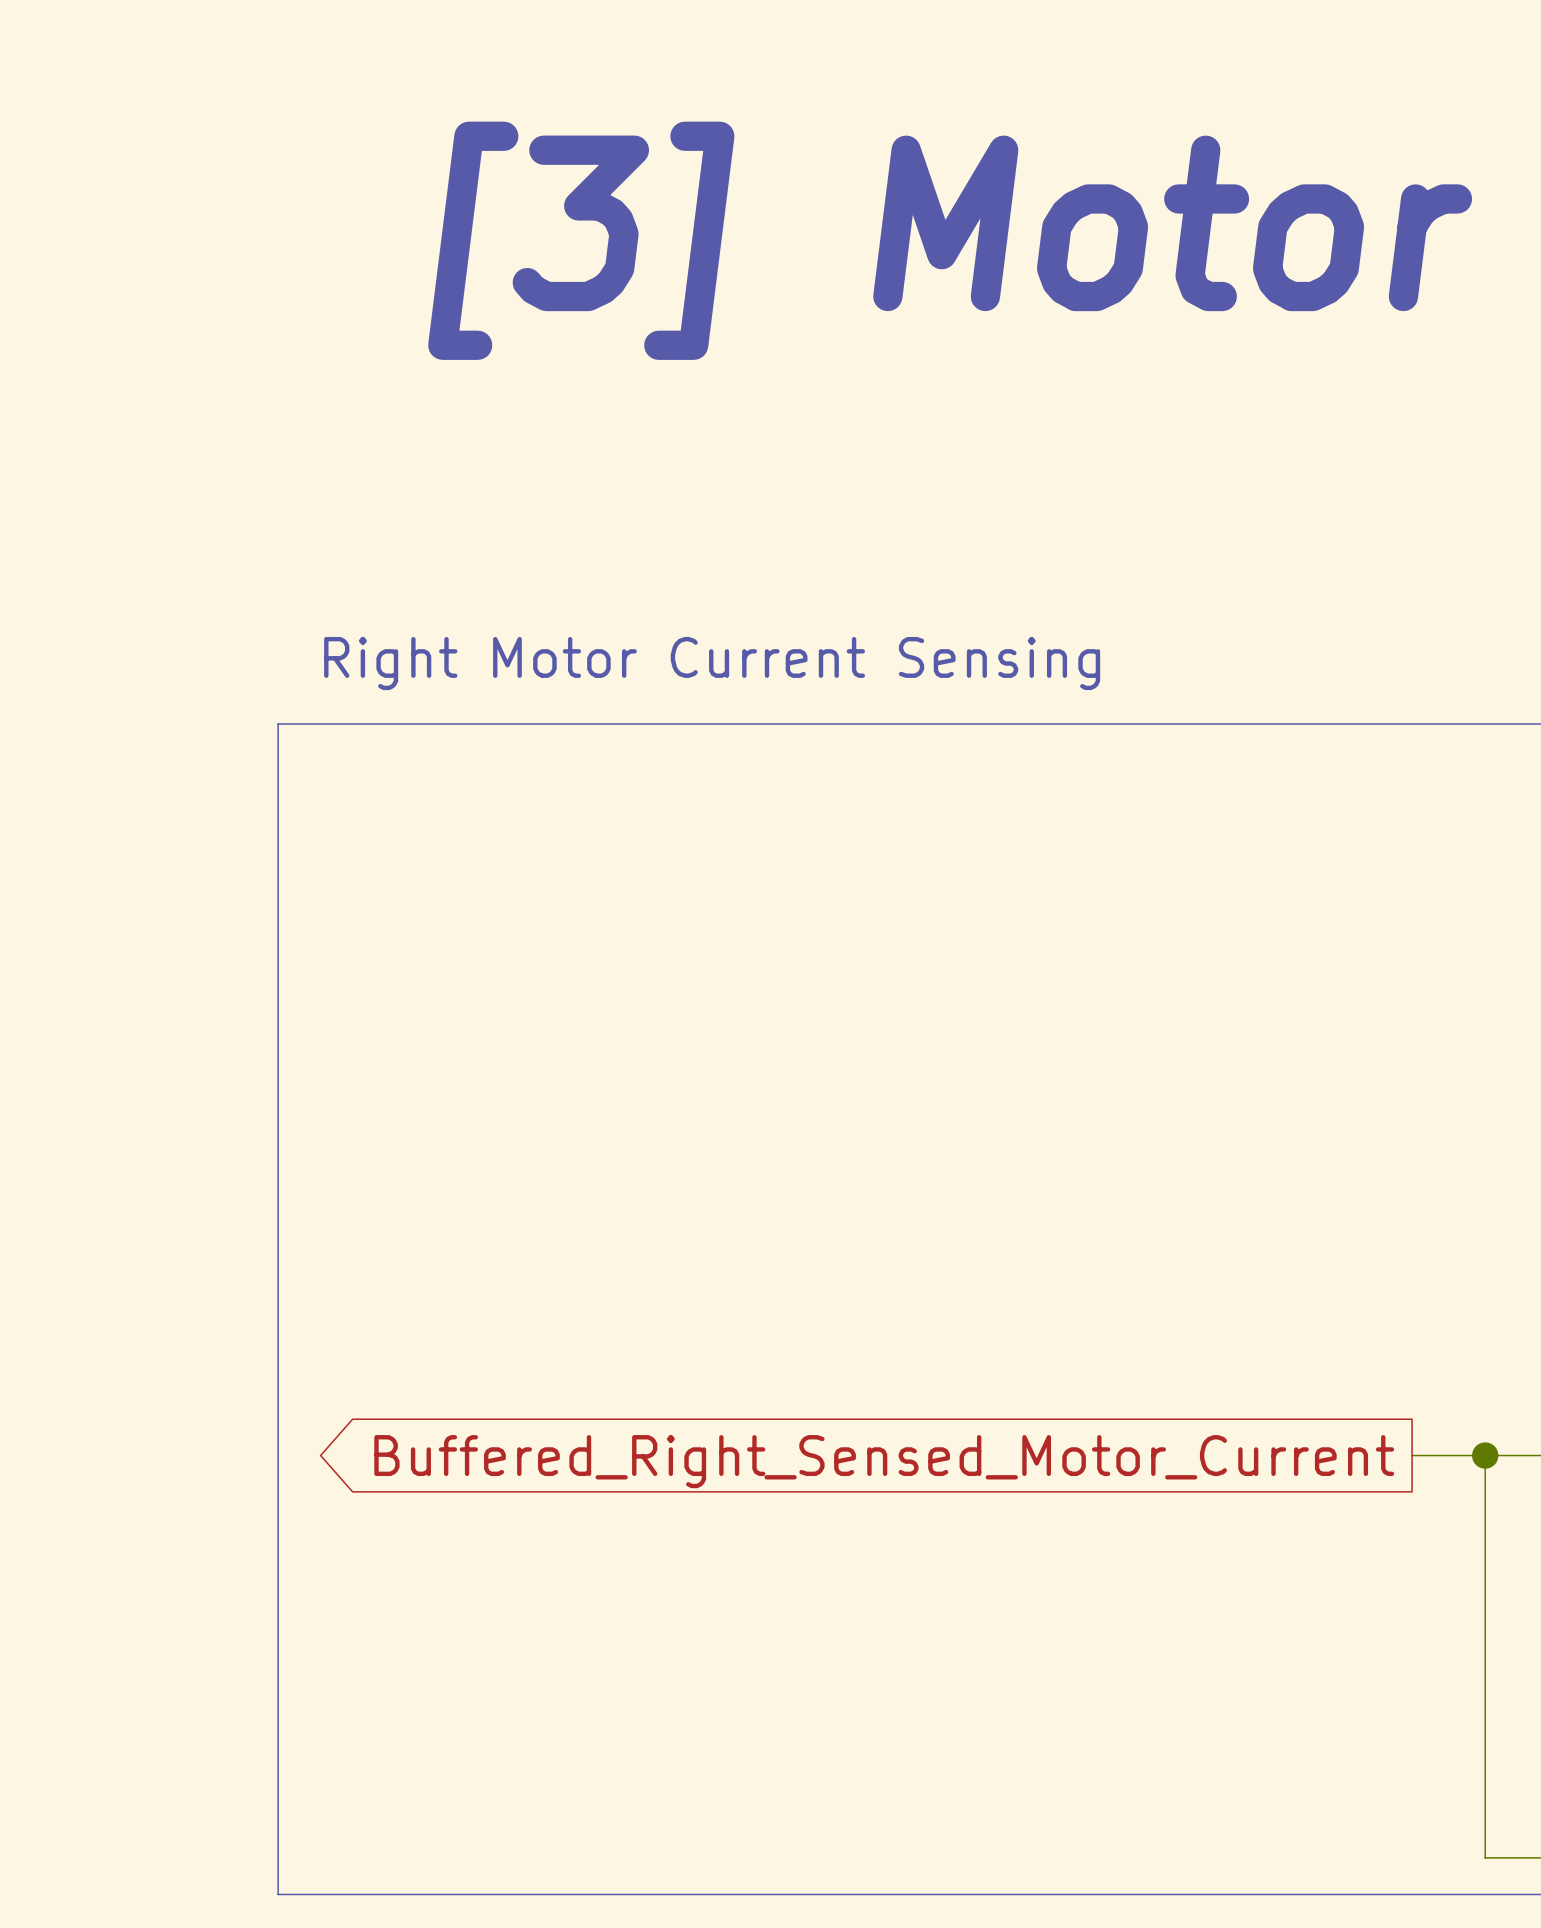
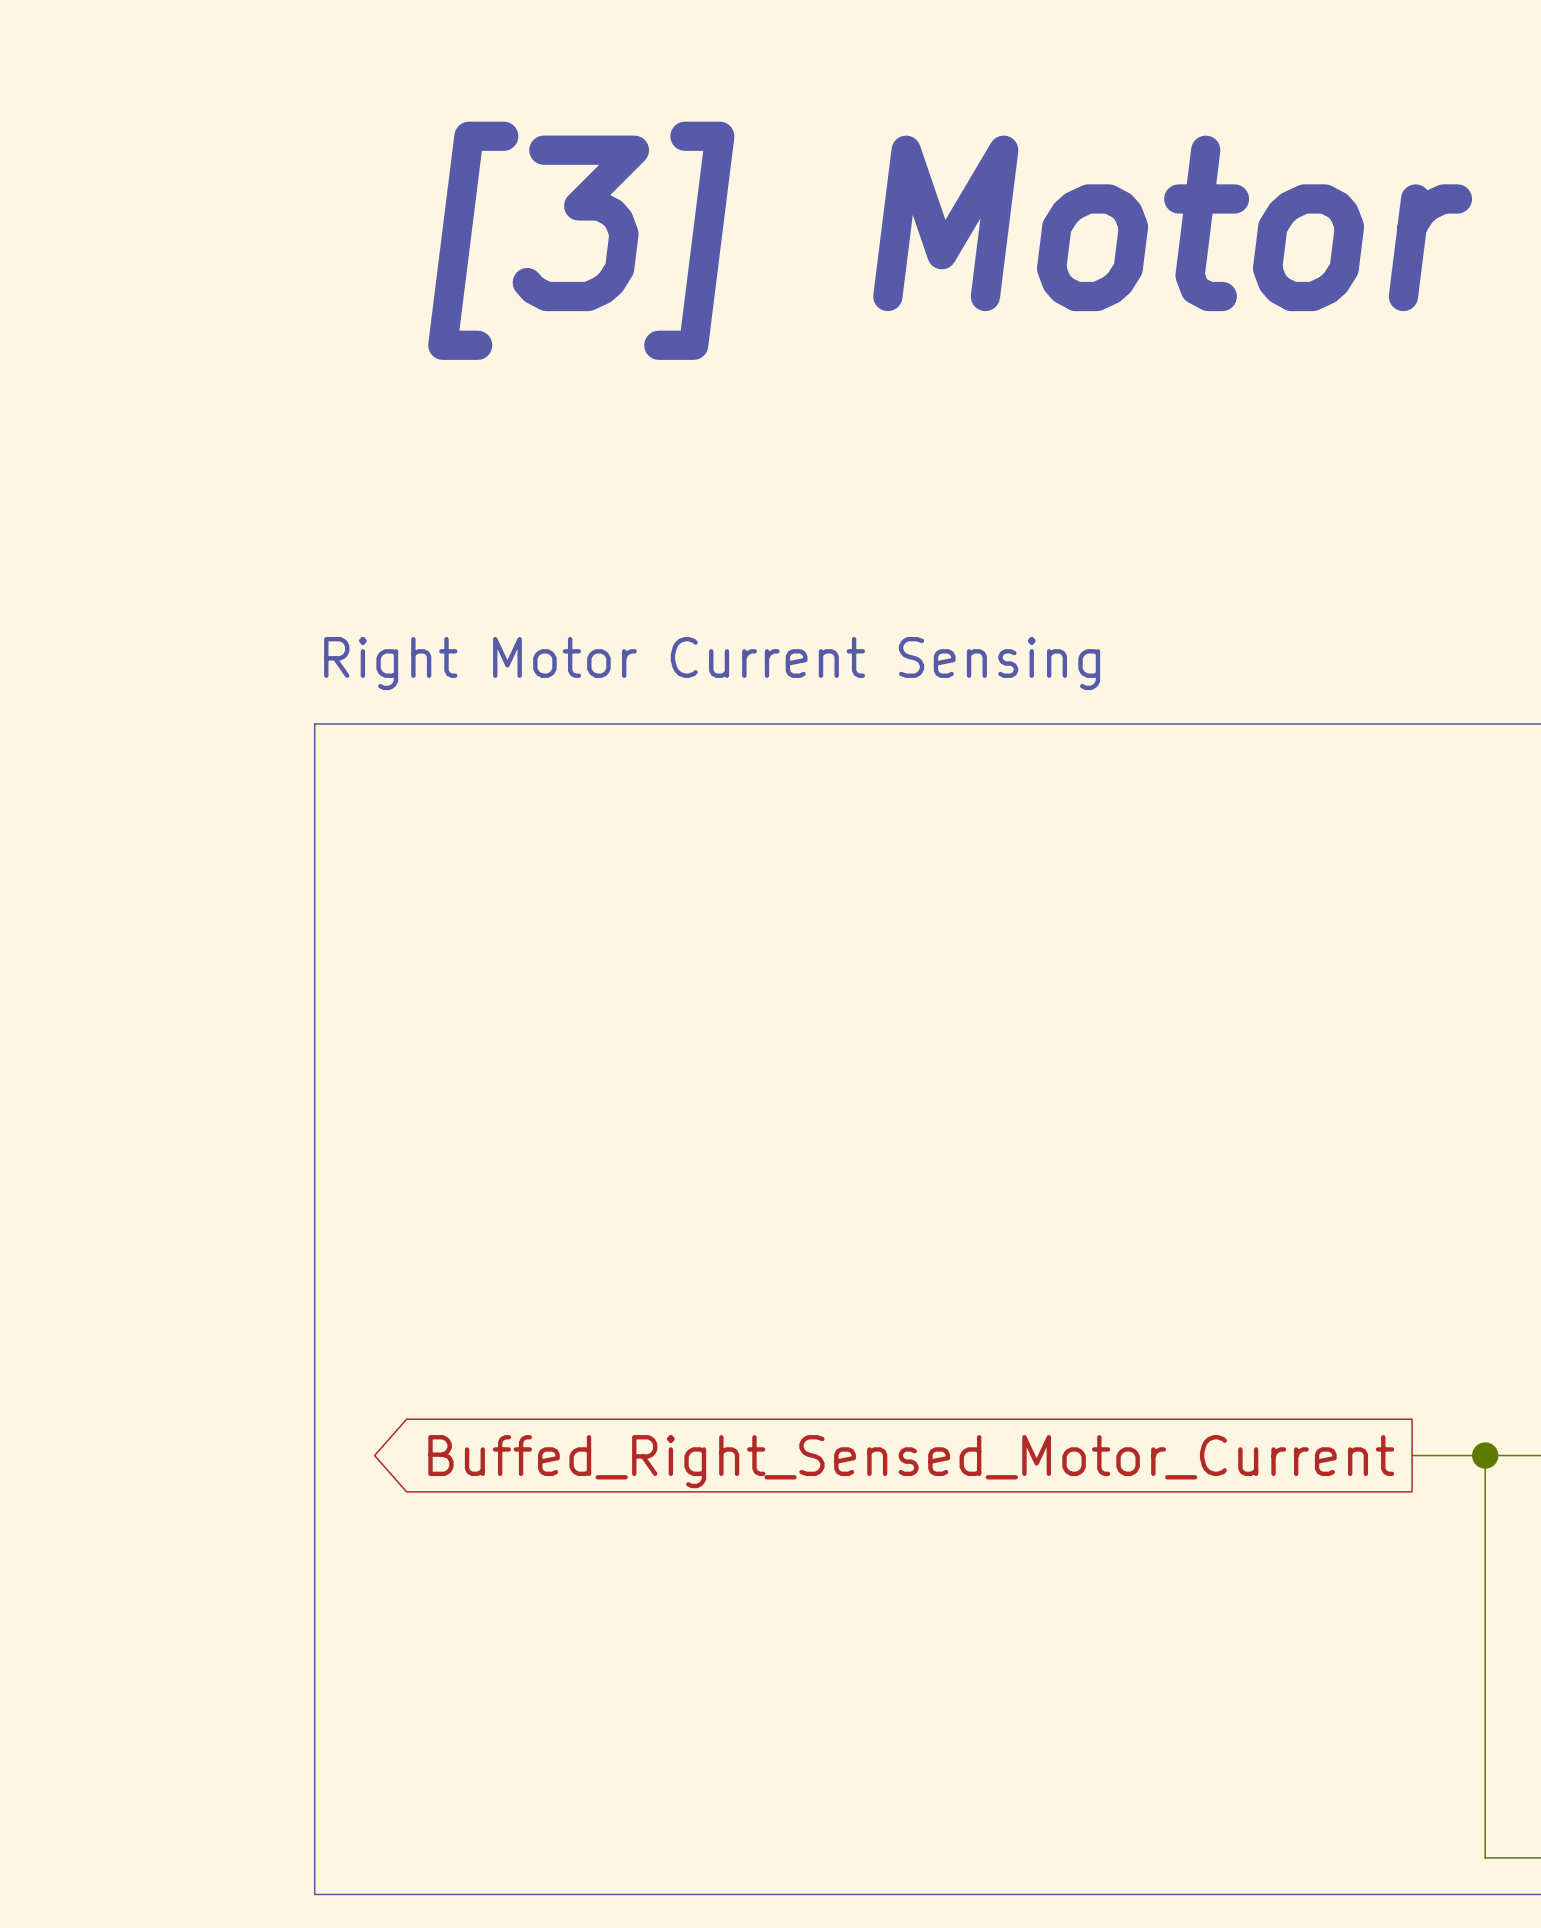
line: (314, 723) (278, 723) (278, 1894) (314, 1894) -> (314, 723) (314, 1894)
global label: Buffered_Right_Sensed_Motor_Current (884, 1461) -> Buffed_Right_Sensed_Motor_Current (911, 1461)

